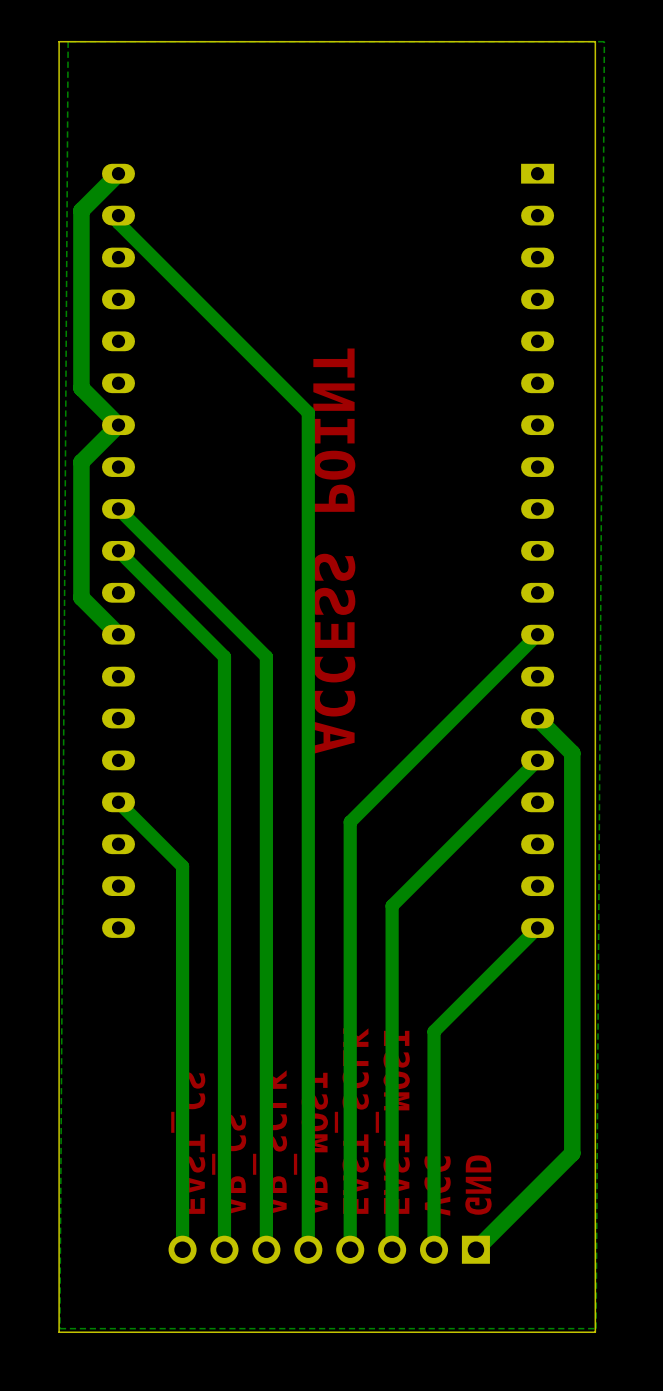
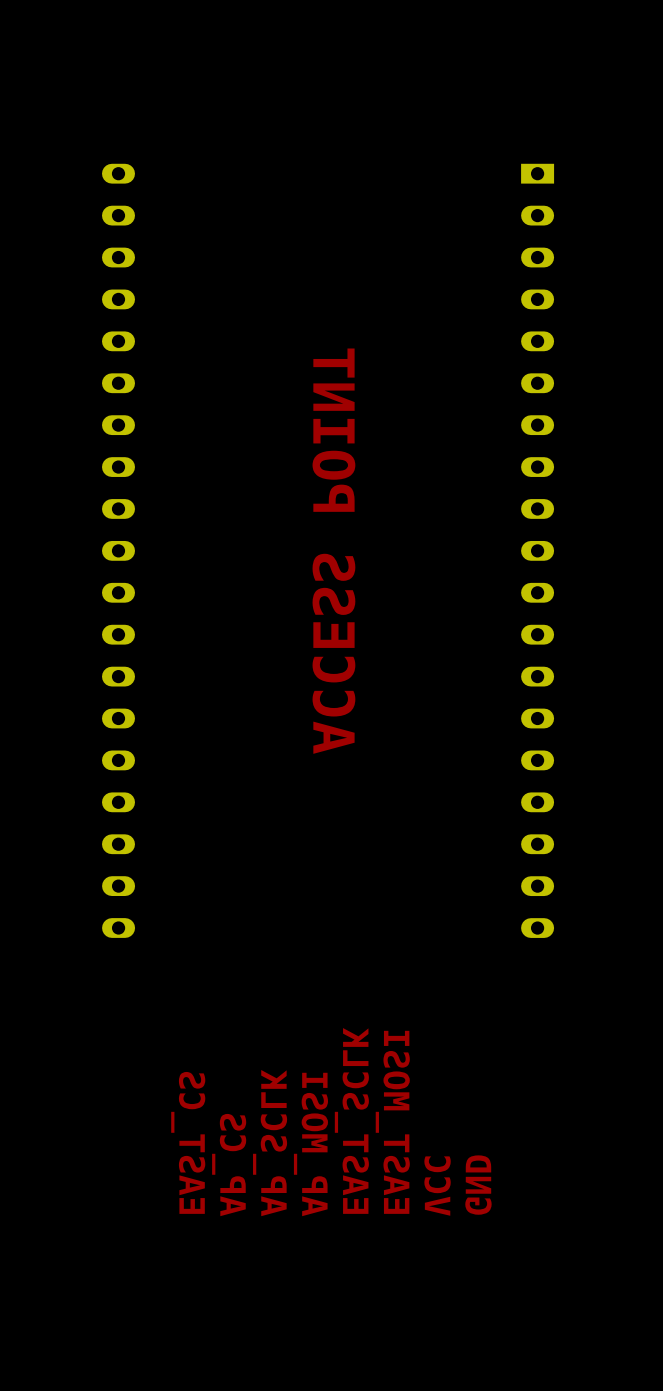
board edge: (595, 41) (59, 41) (59, 1332) (595, 1332) (595, 41) -> none
bottom zone outline: (604, 41) (596, 1328) (59, 1328) (68, 41) (604, 41) -> none
bottom track: (118, 173) (81, 210) (81, 388) (118, 425) (81, 462) (81, 597) (118, 634) -> none
bottom track: (118, 215) (118, 222) (308, 412) (308, 1249) -> none
bottom track: (118, 508) (266, 656) (266, 1249) -> none
bottom track: (118, 550) (224, 656) (224, 1249) -> none
bottom track: (537, 634) (350, 822) (350, 1249) -> none
bottom track: (537, 718) (572, 753) (572, 1153) (475, 1249) -> none
bottom track: (537, 760) (392, 905) (392, 1249) -> none
bottom track: (118, 802) (182, 866) (182, 1249) -> none
bottom track: (537, 928) (434, 1031) (434, 1249) -> none
part: (329, 1249) -> none

